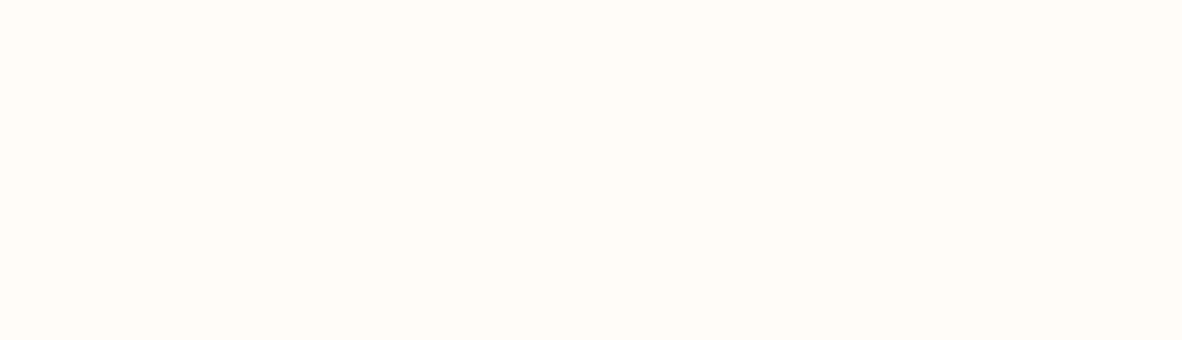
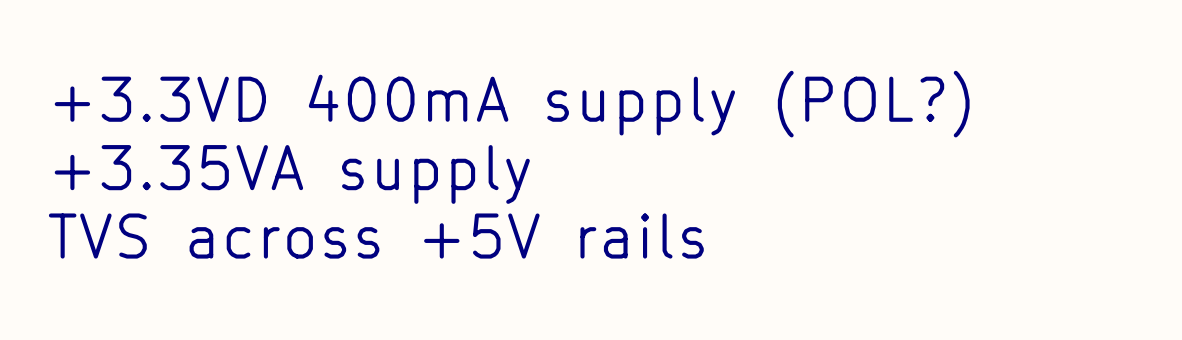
text: none -> +3.3VD 400mA supply (POL?) (512, 104)
text: none -> +3.35VA supply (292, 174)
text: none -> TVS across +5V rails (376, 236)

